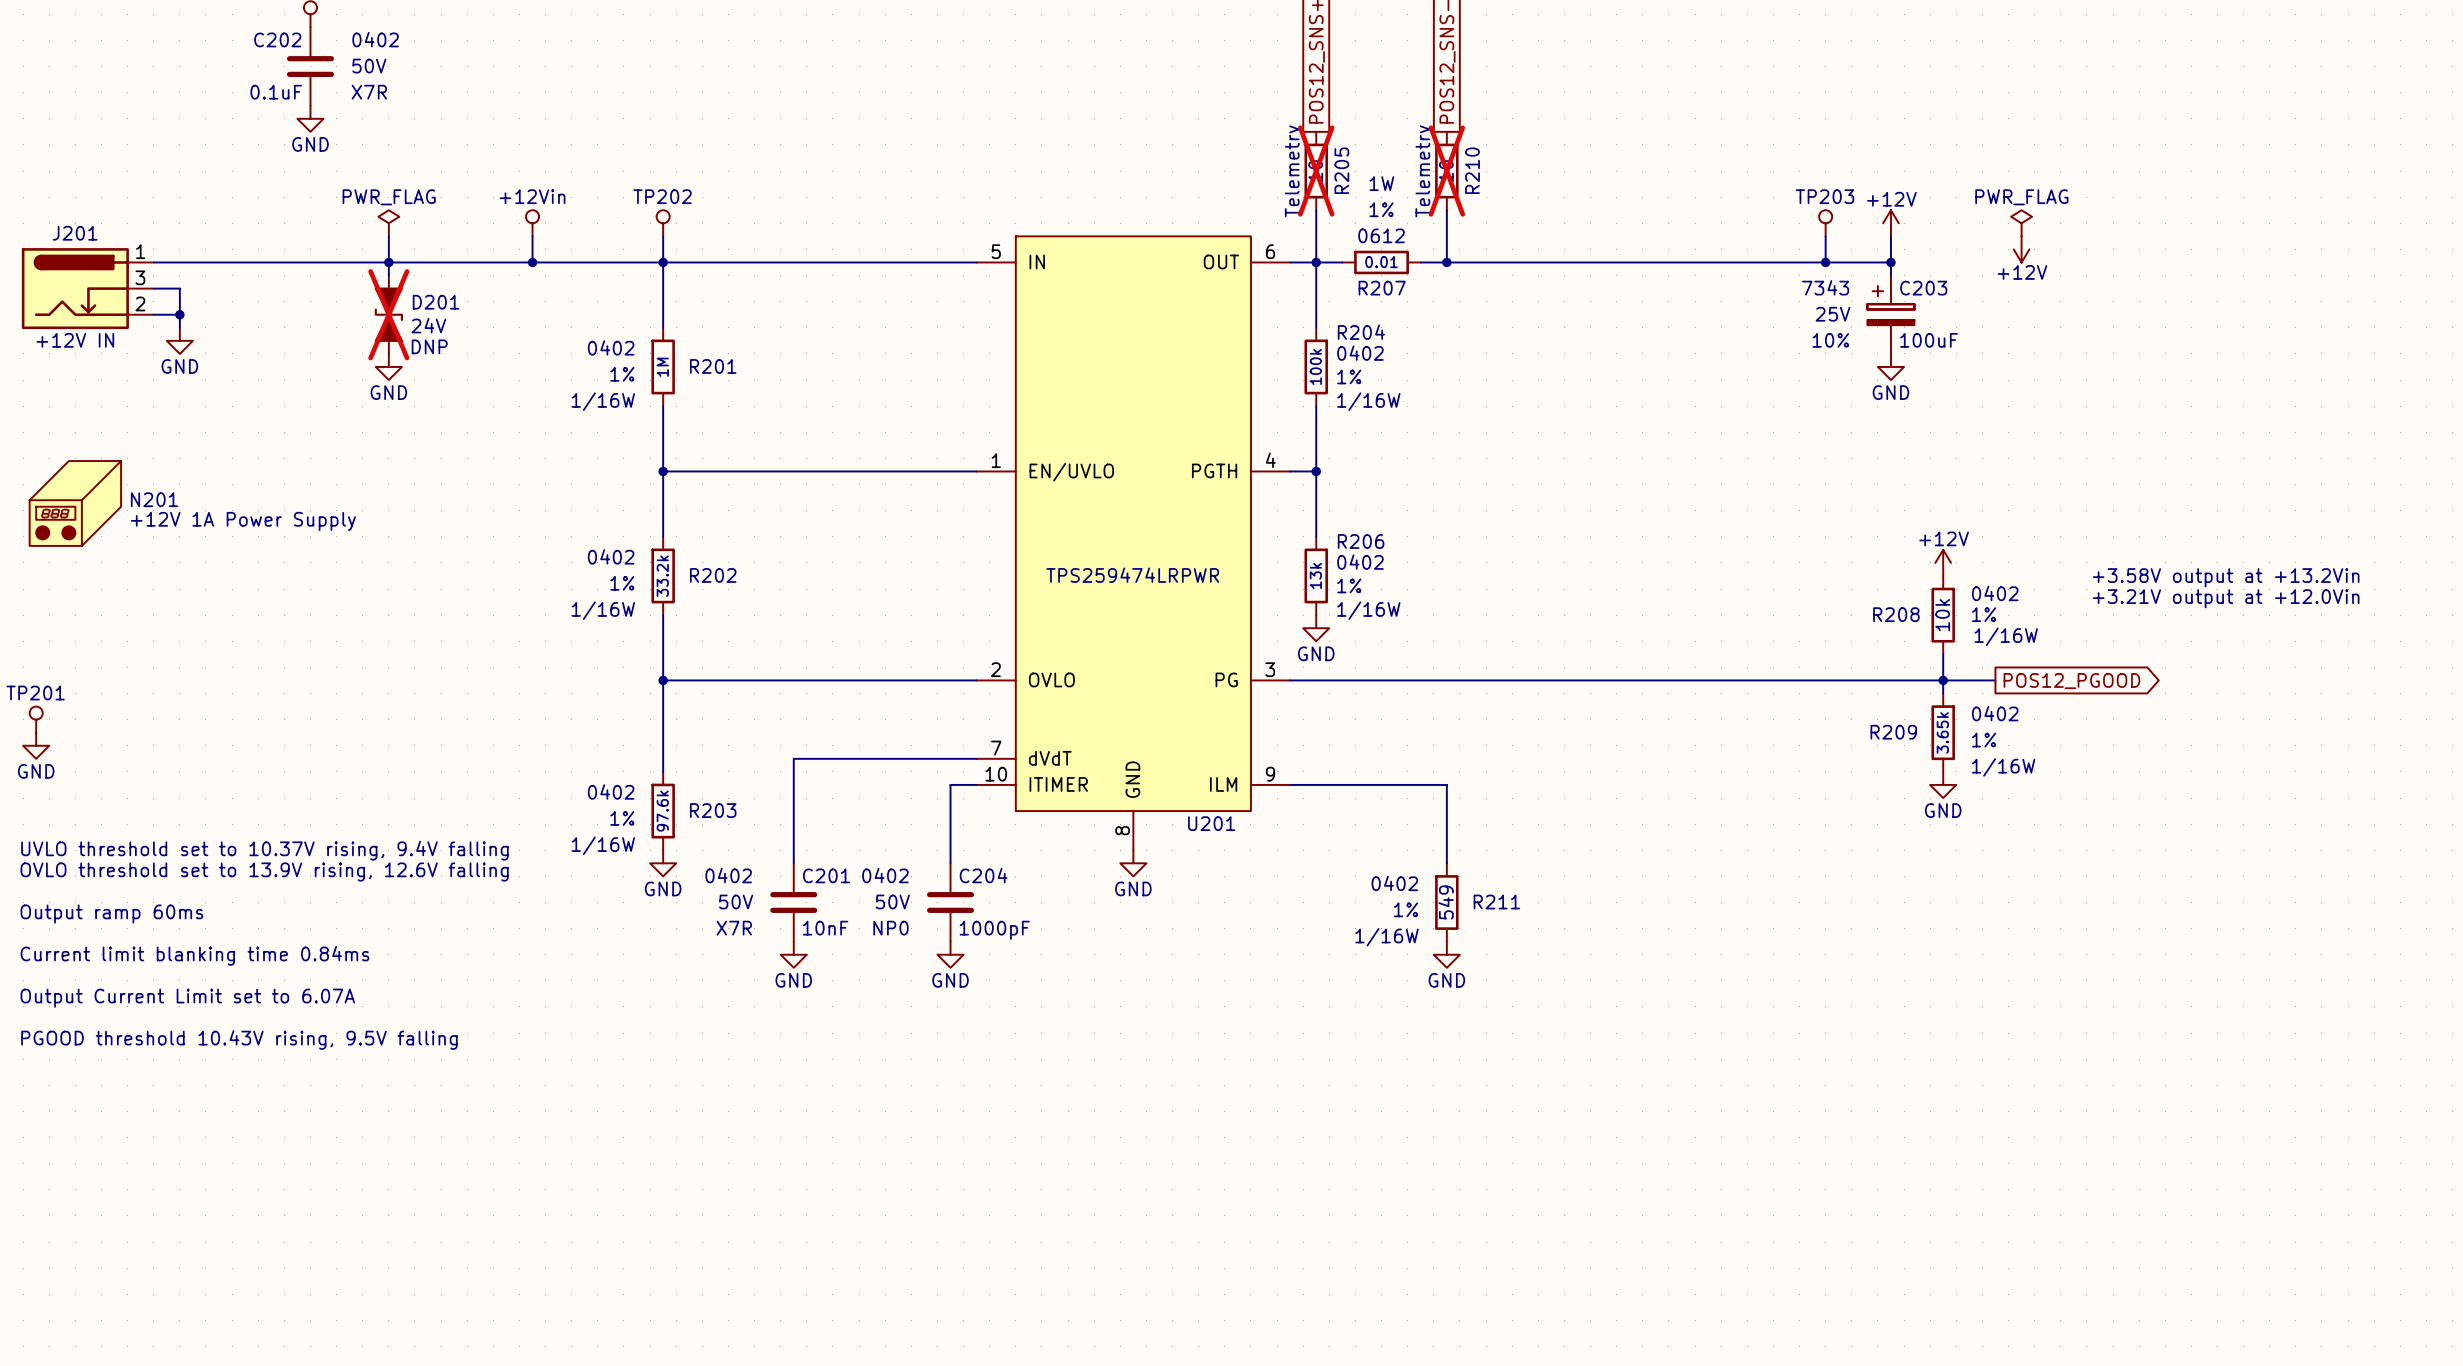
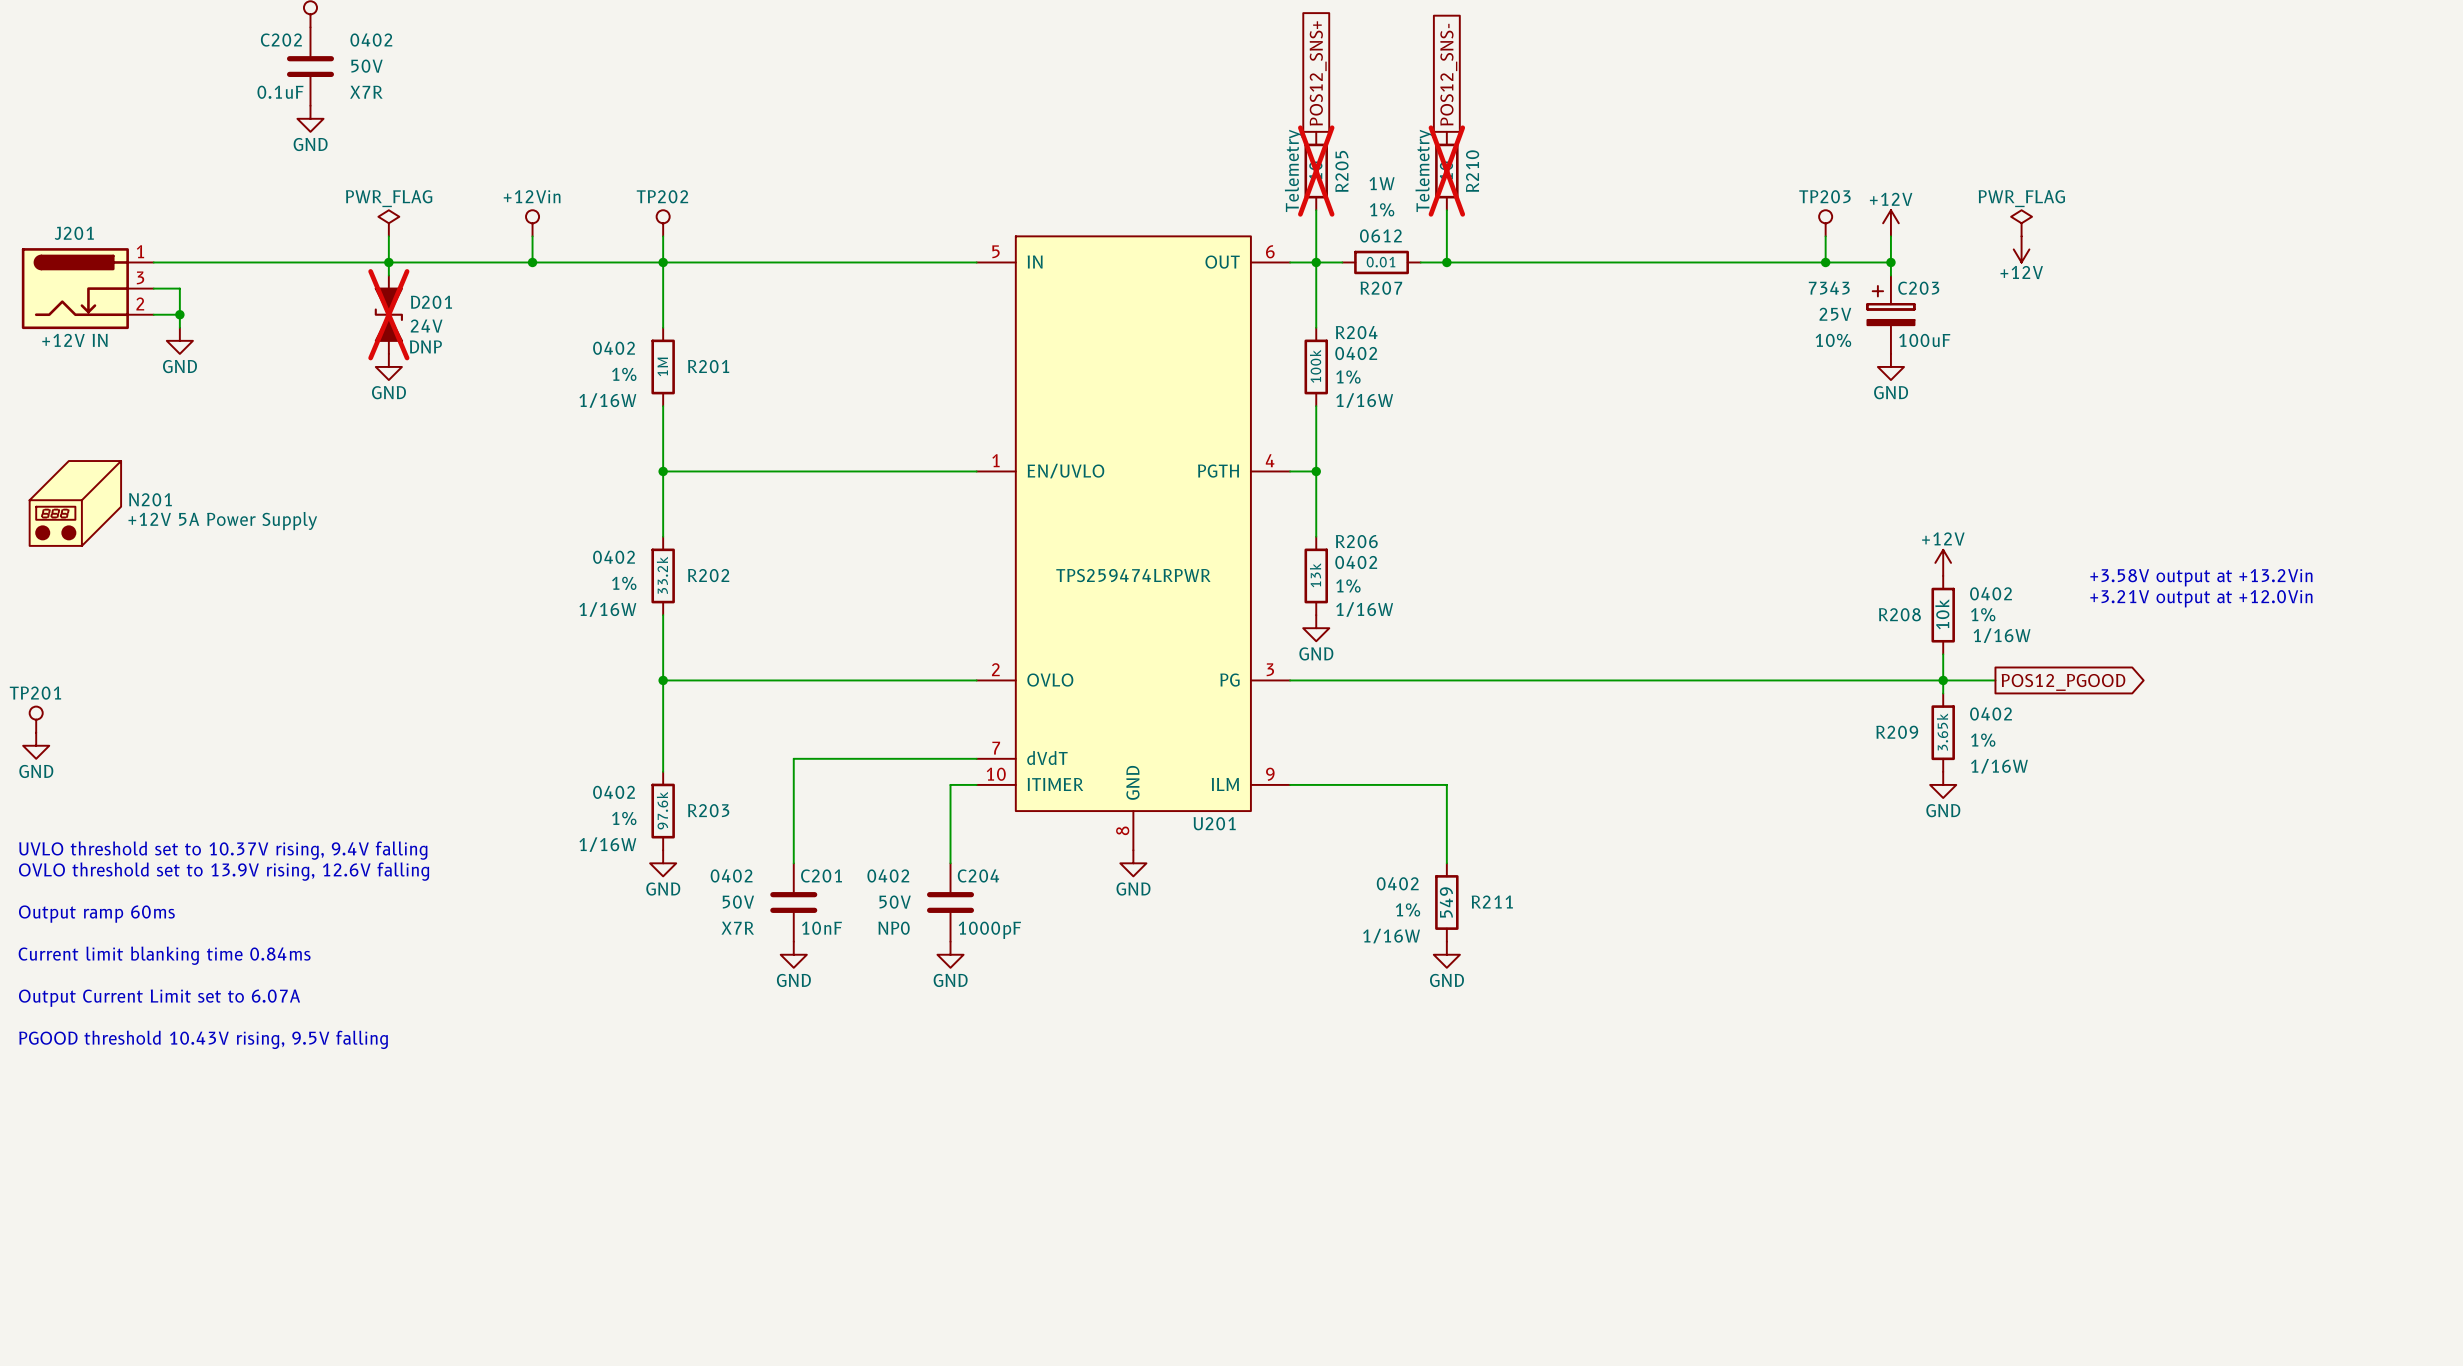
N201 value: +12V 1A Power Supply (243, 521) -> +12V 5A Power Supply (222, 521)

